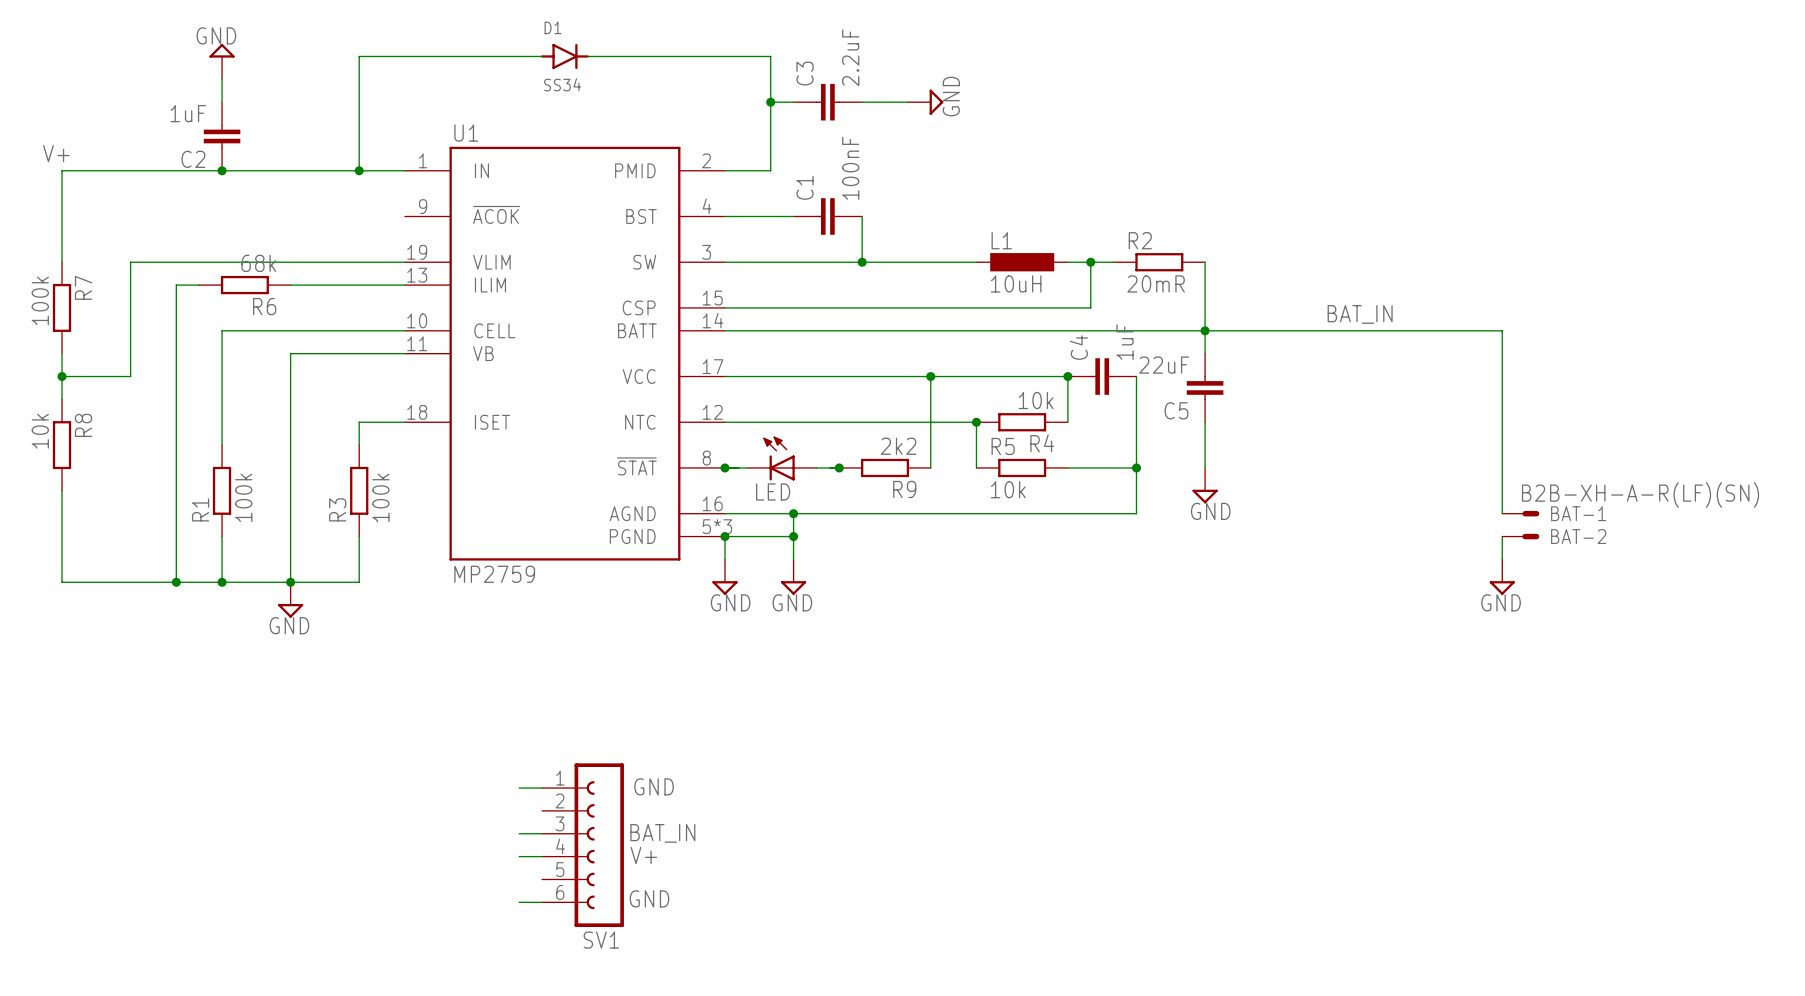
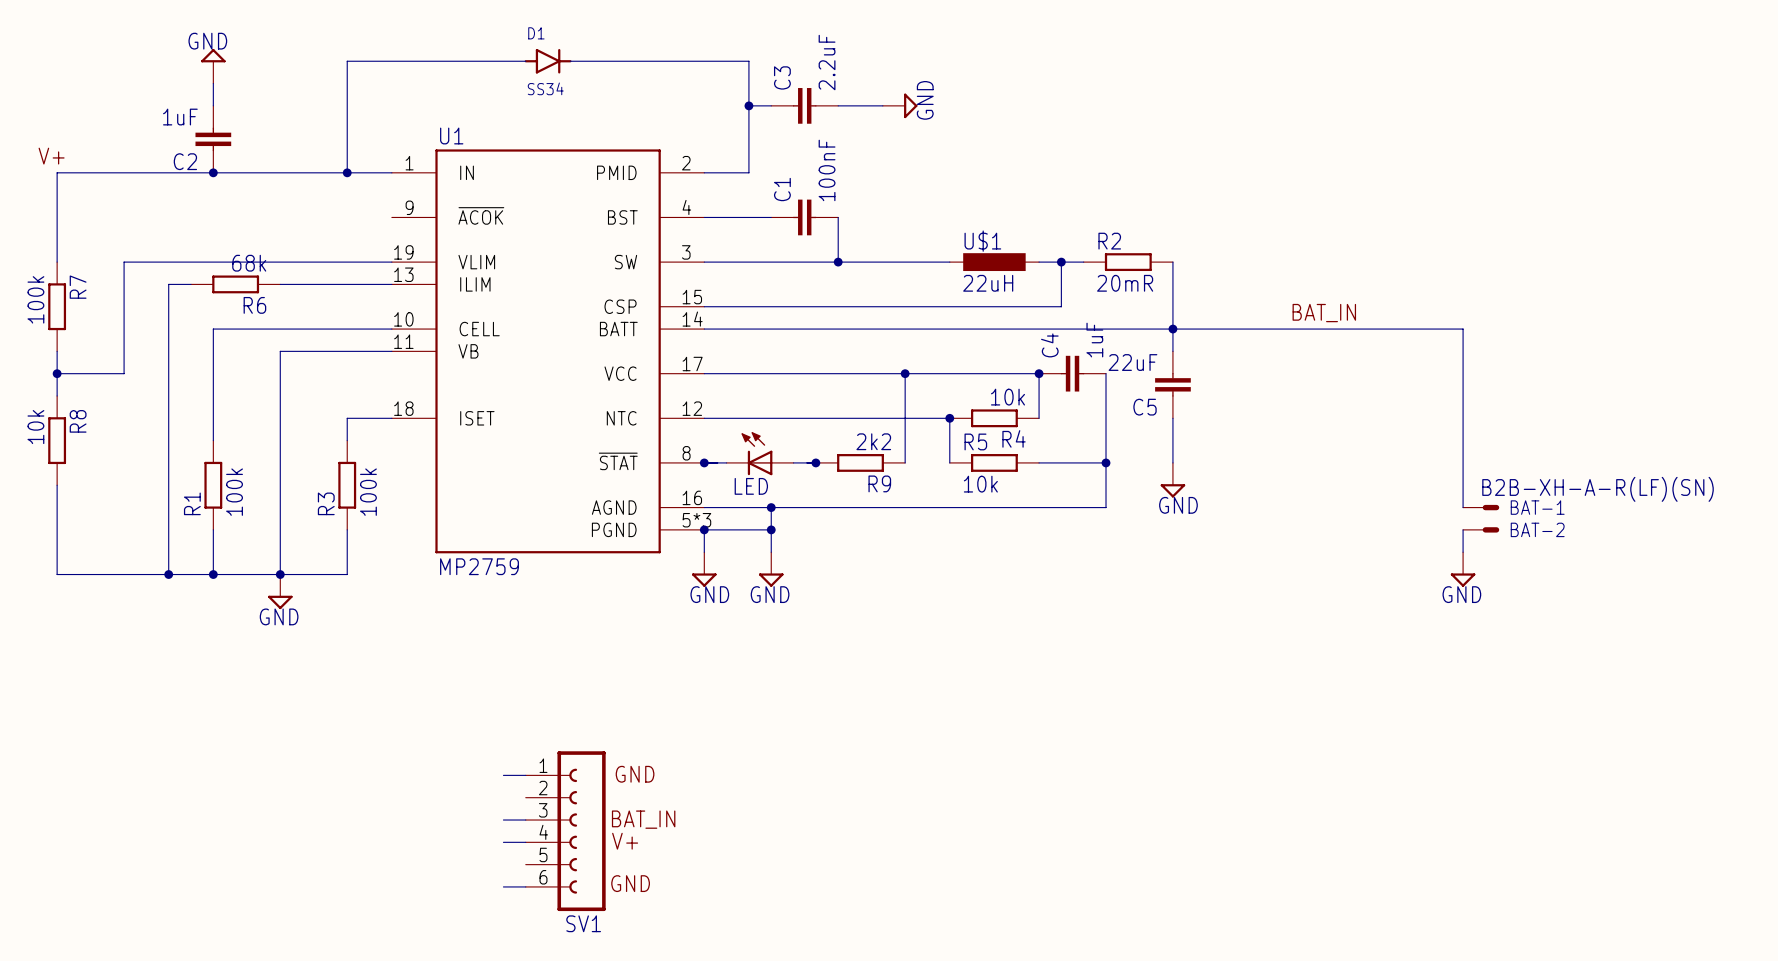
L1 name: L1 (1001, 240) -> U$1 (982, 241)
L1 value: 10uH (1016, 283) -> 22uH (988, 283)

